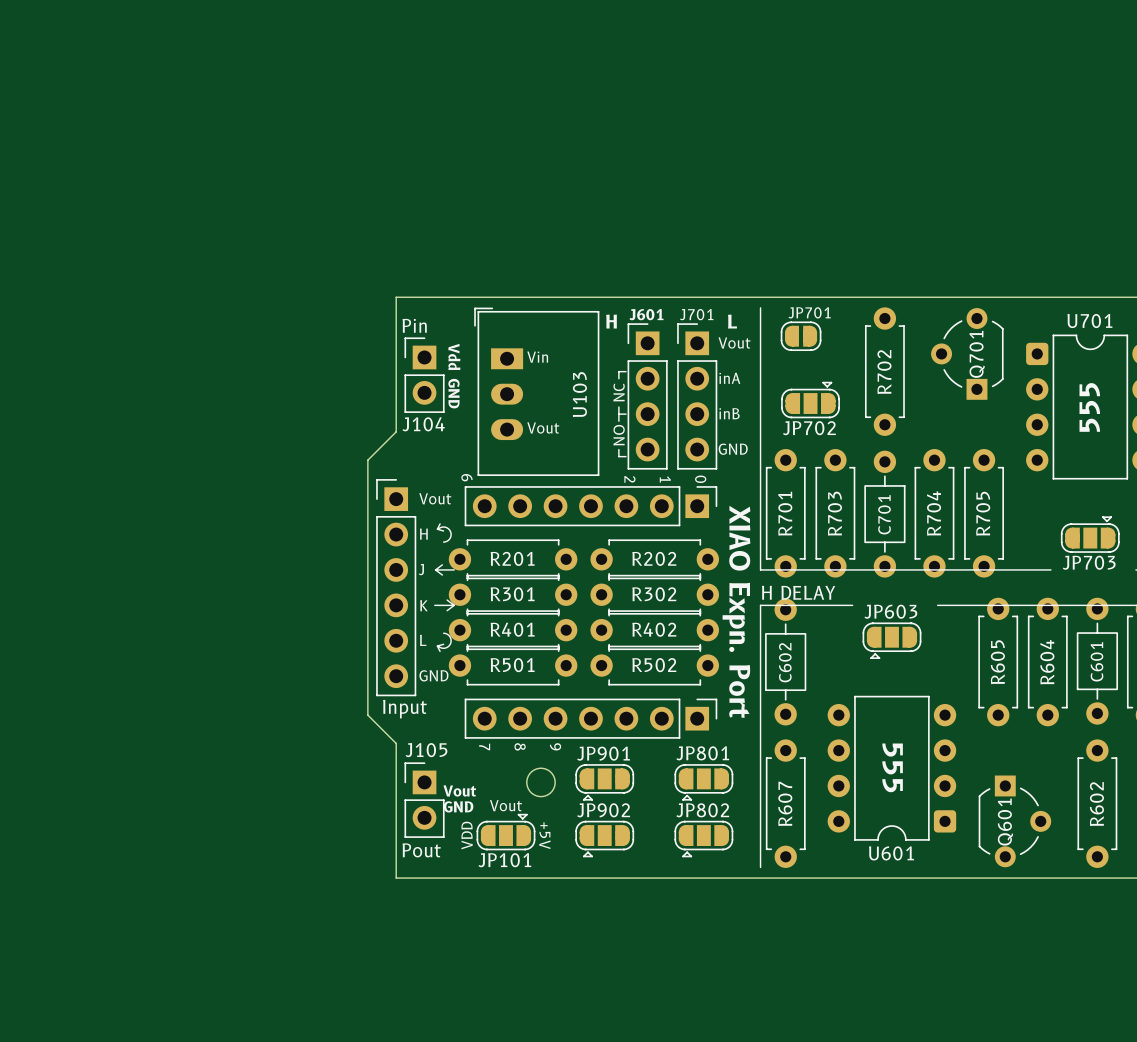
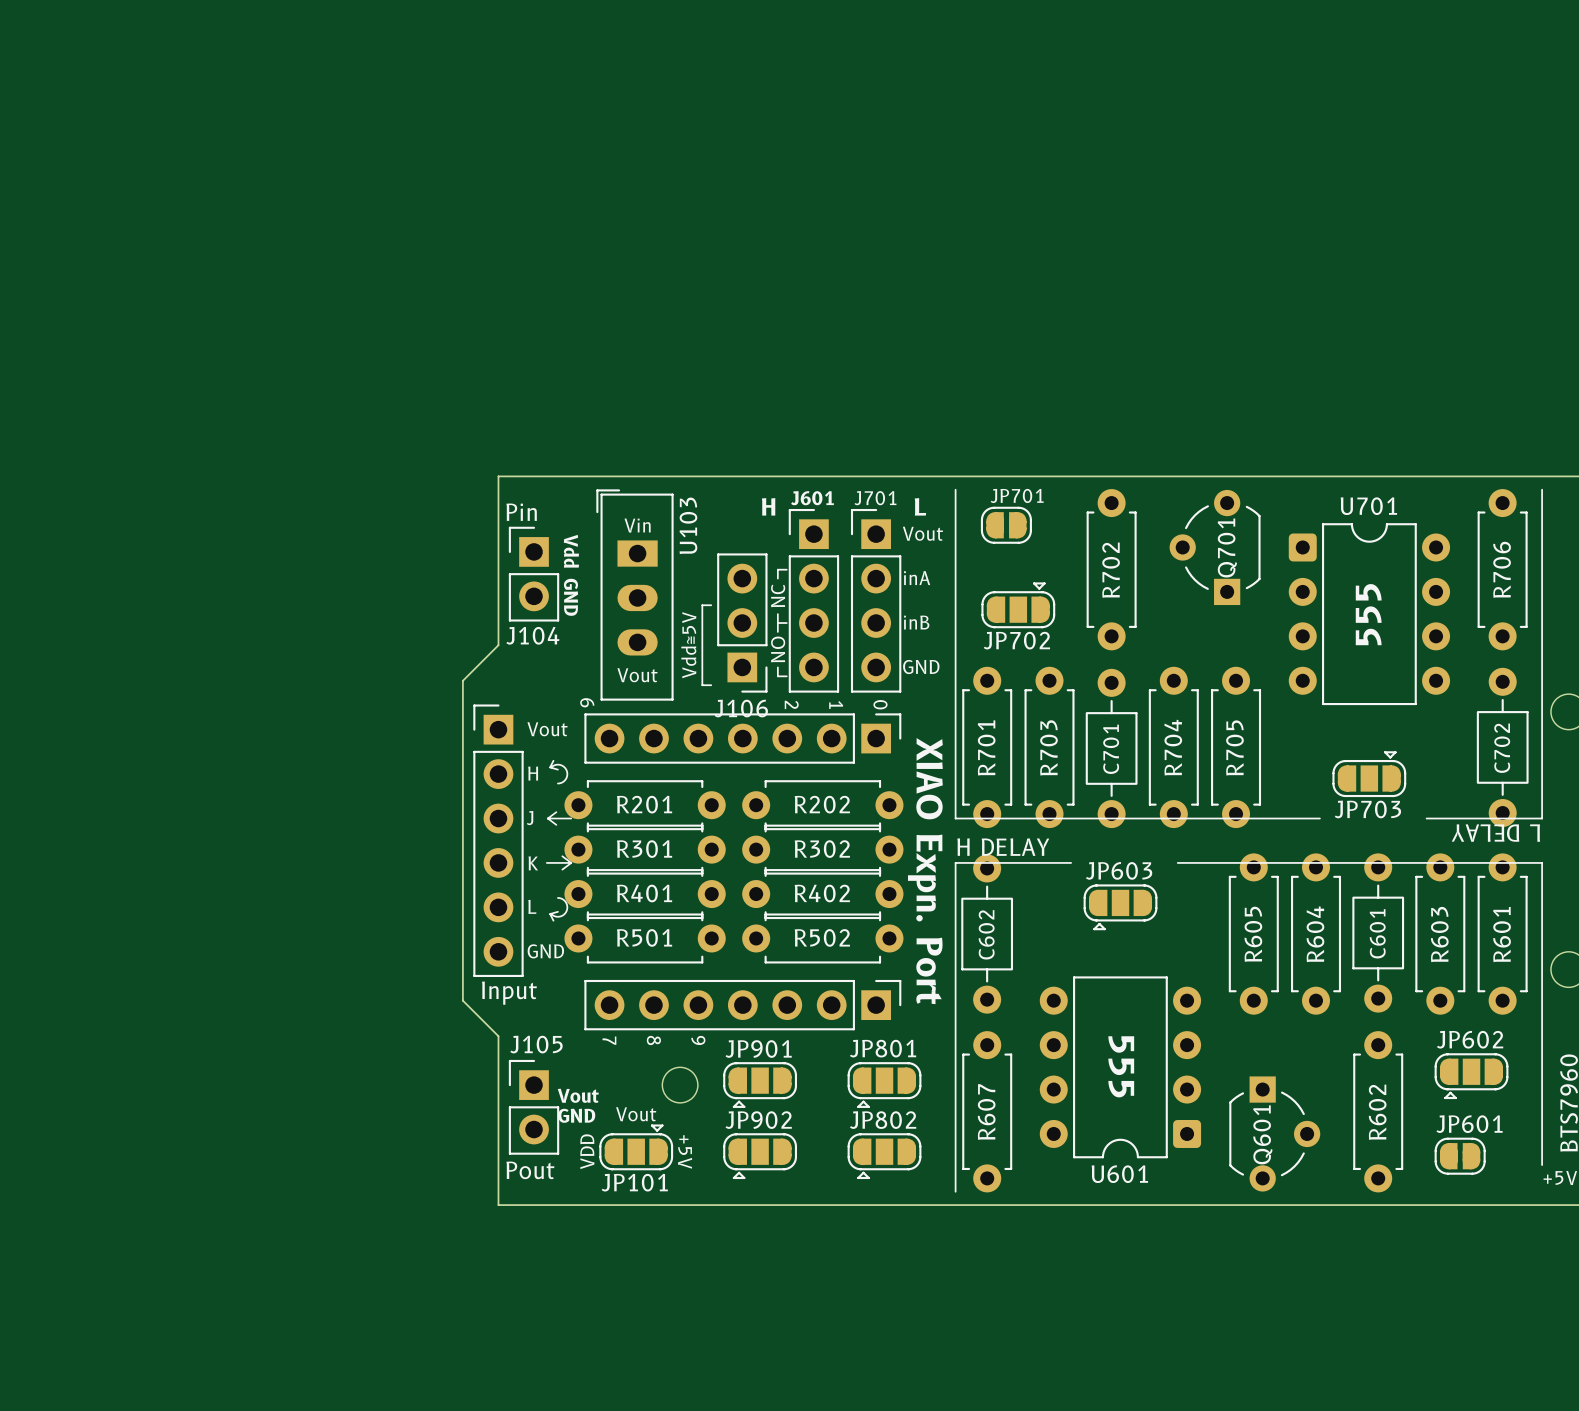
U103 footprint: [474, 307, 600, 477] -> [596, 489, 674, 701]
text position: Vin (537, 357) -> Vin (637, 525)
U103 name position: U103 (579, 394) -> U103 (688, 525)
line: none -> (711, 605) (702, 605) (702, 685) (711, 685)
J106: none -> (742, 623)
text position: Vout (543, 427) -> Vout (637, 675)
text: none -> Vdd≅5V (688, 645)

